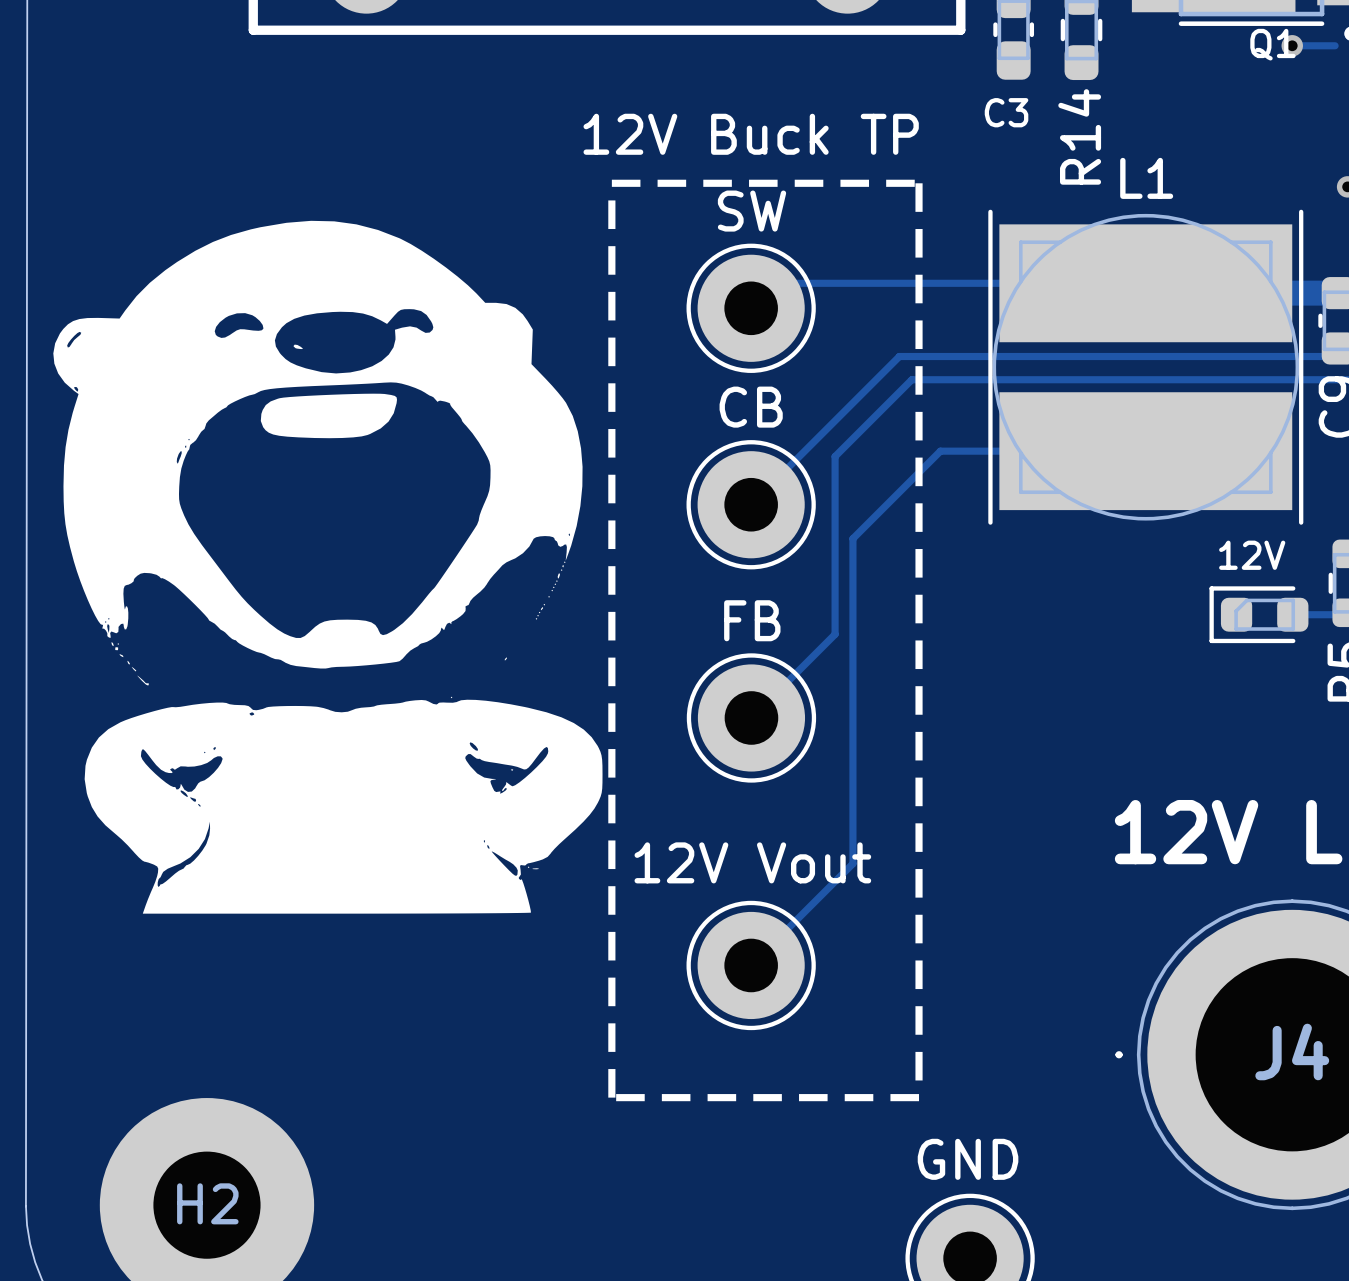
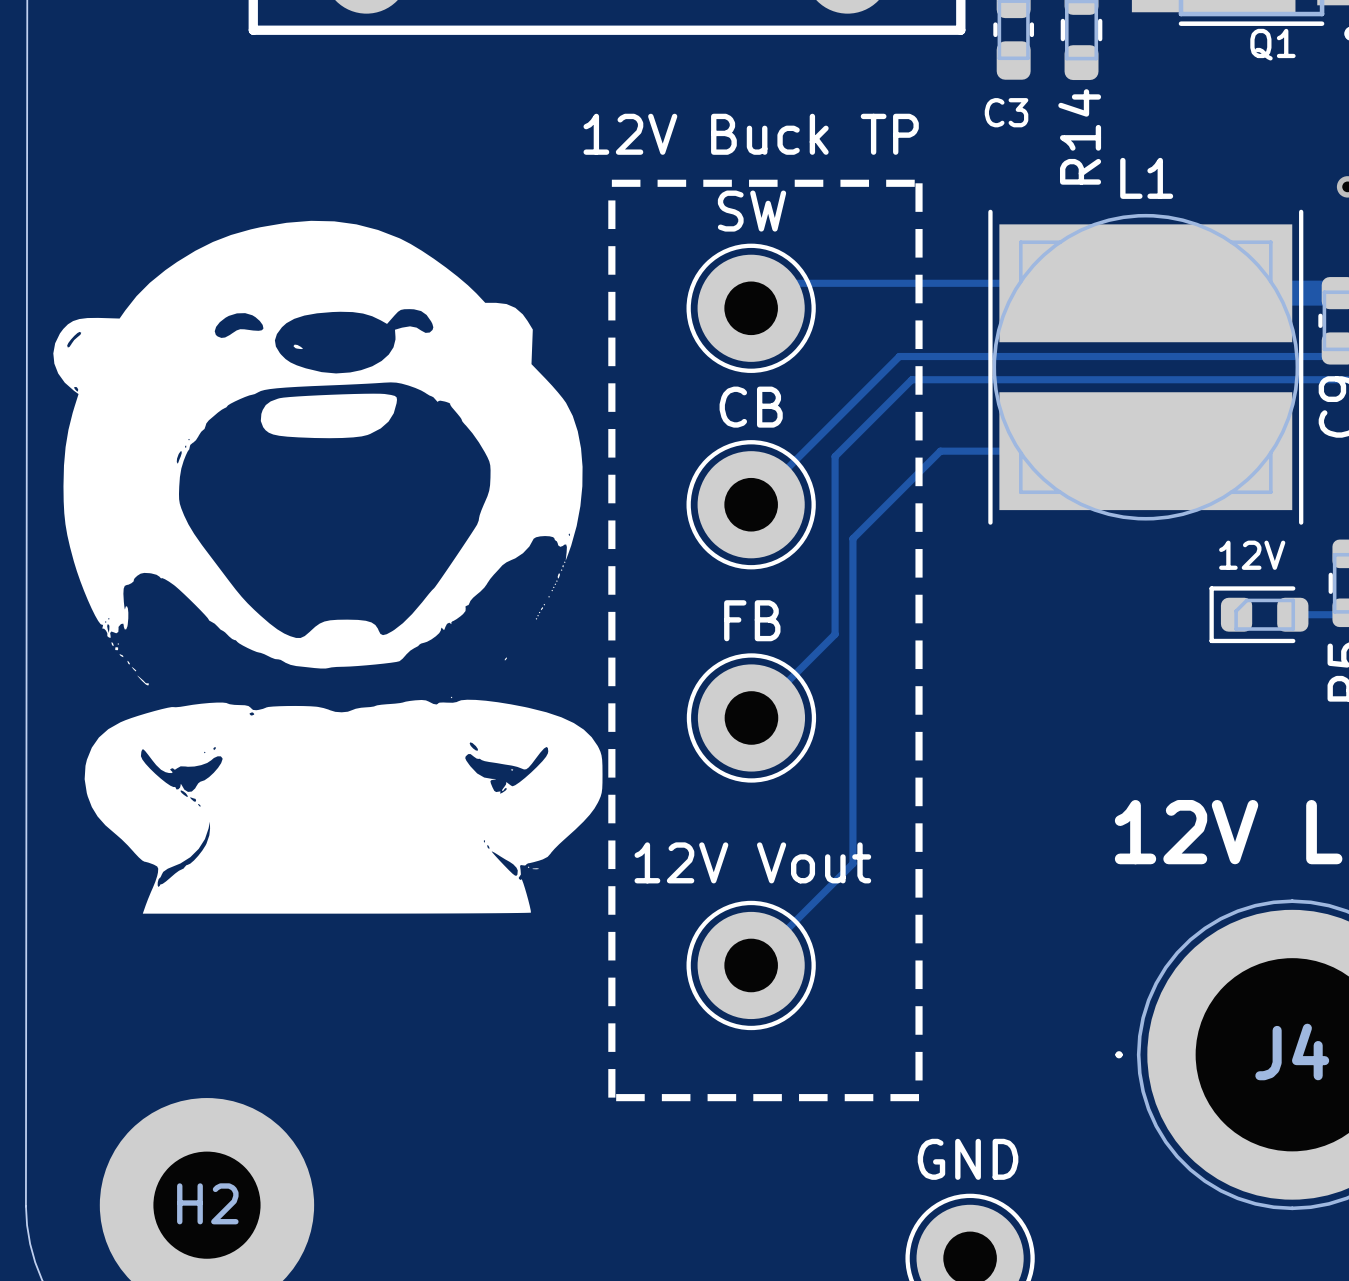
track: (1292, 45) (1335, 45) -> none
via: (1292, 45) -> none

